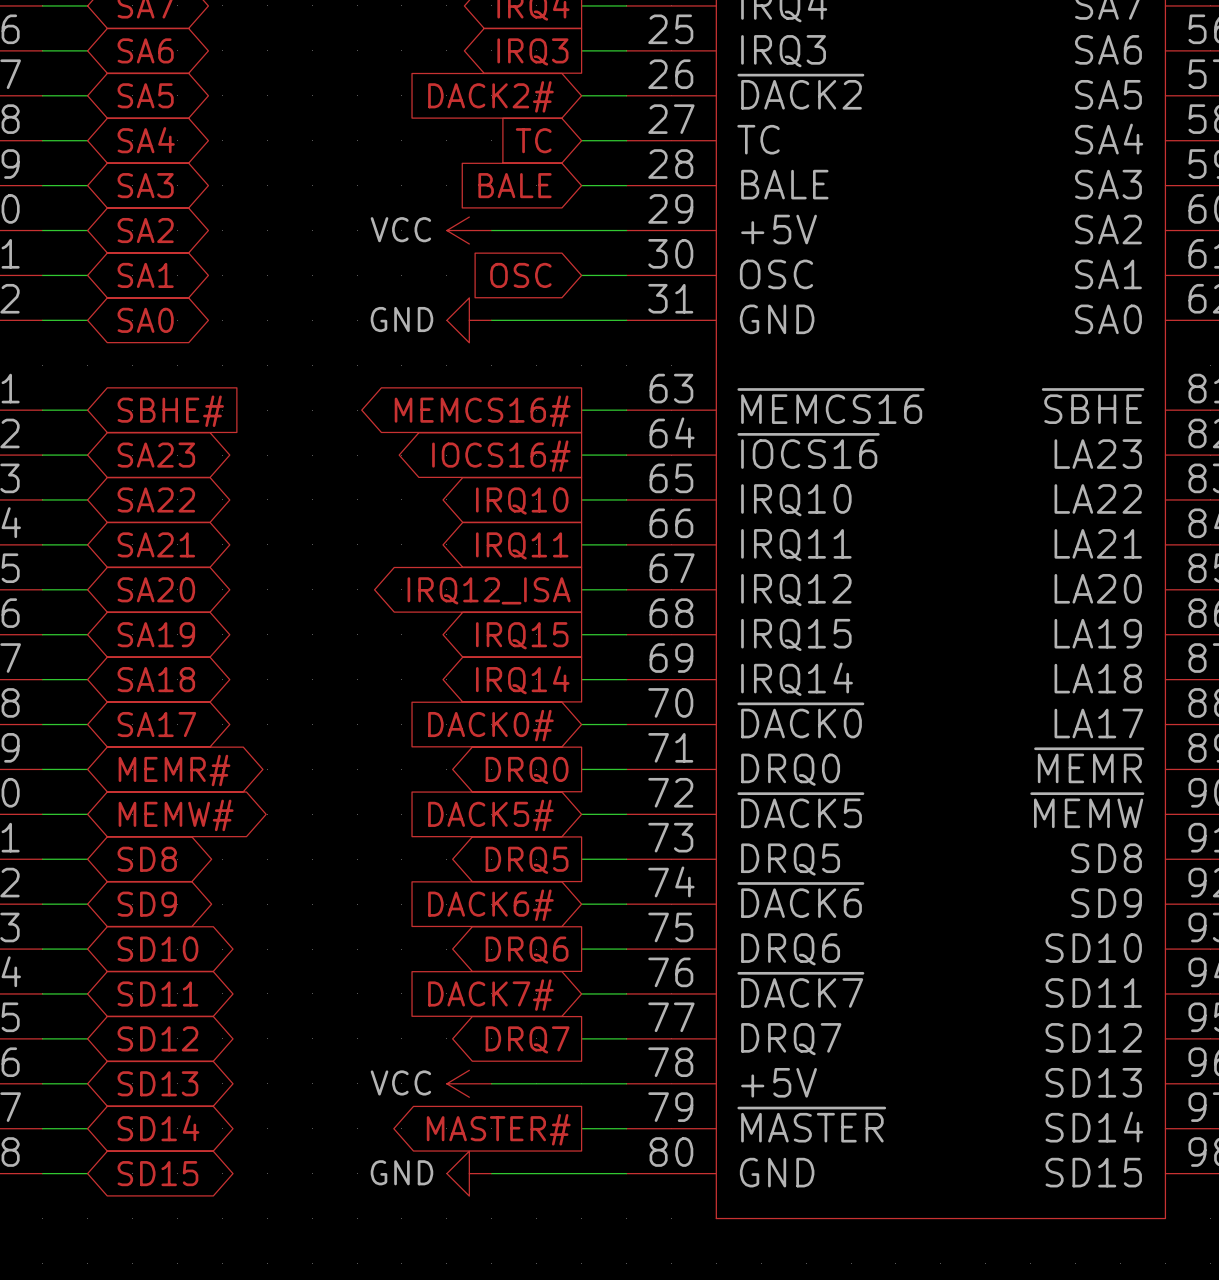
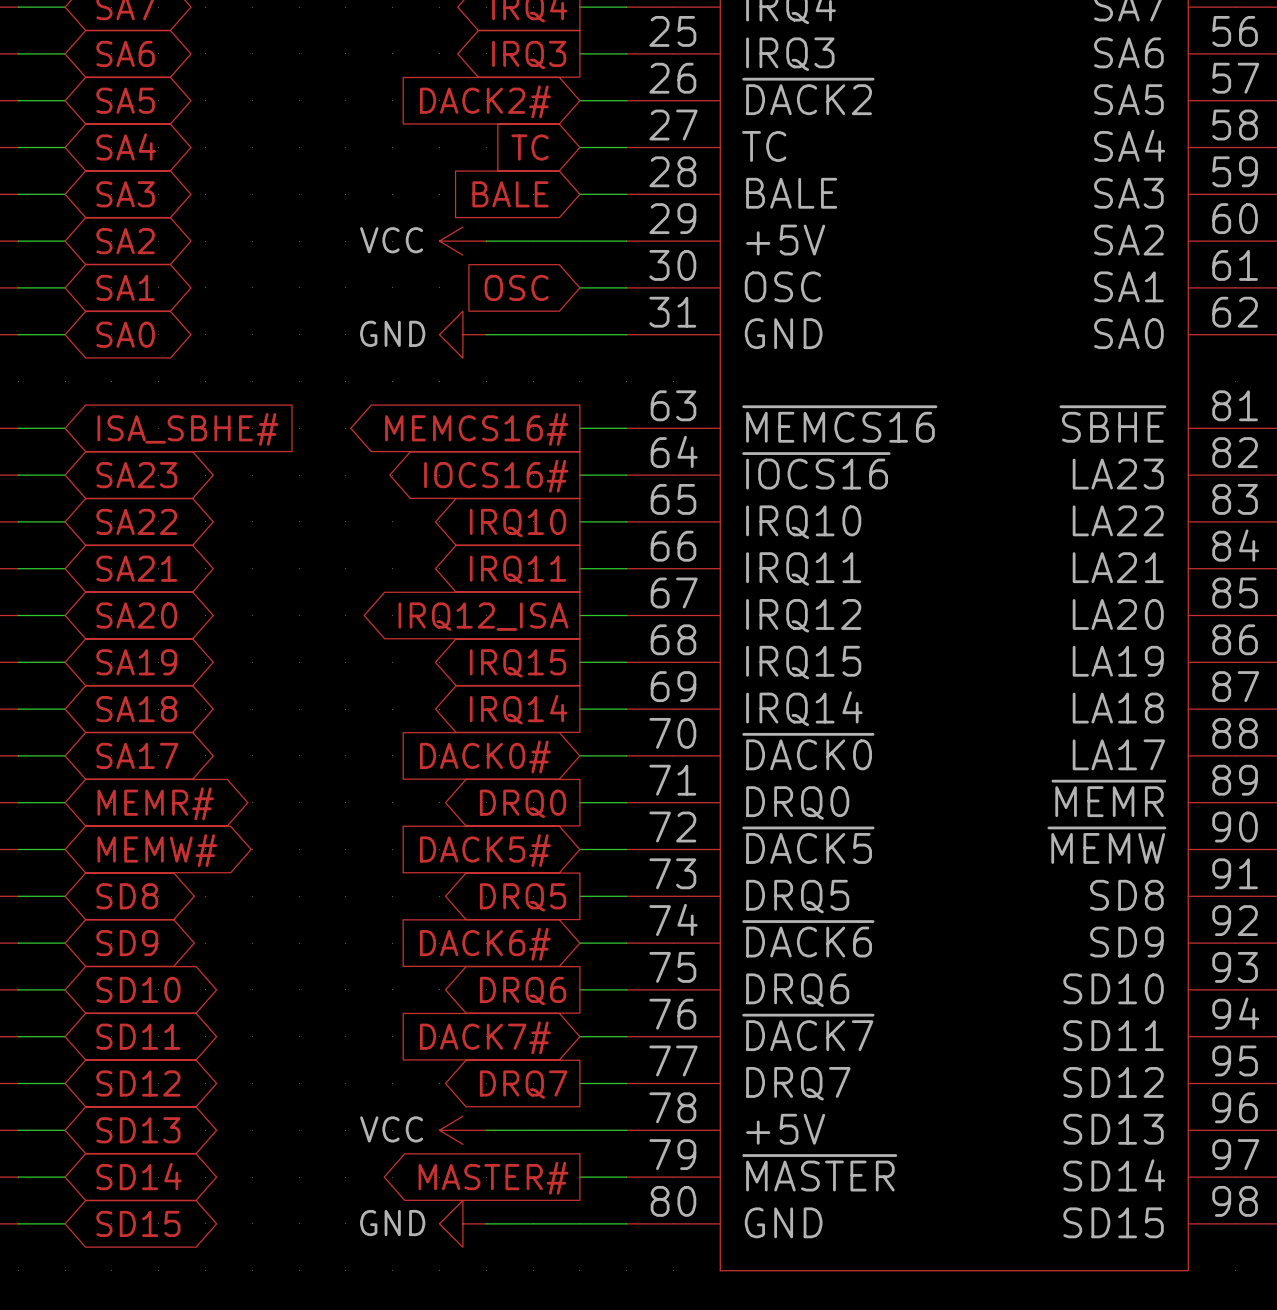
global label: SBHE# (170, 411) -> ISA_SBHE# (187, 429)

